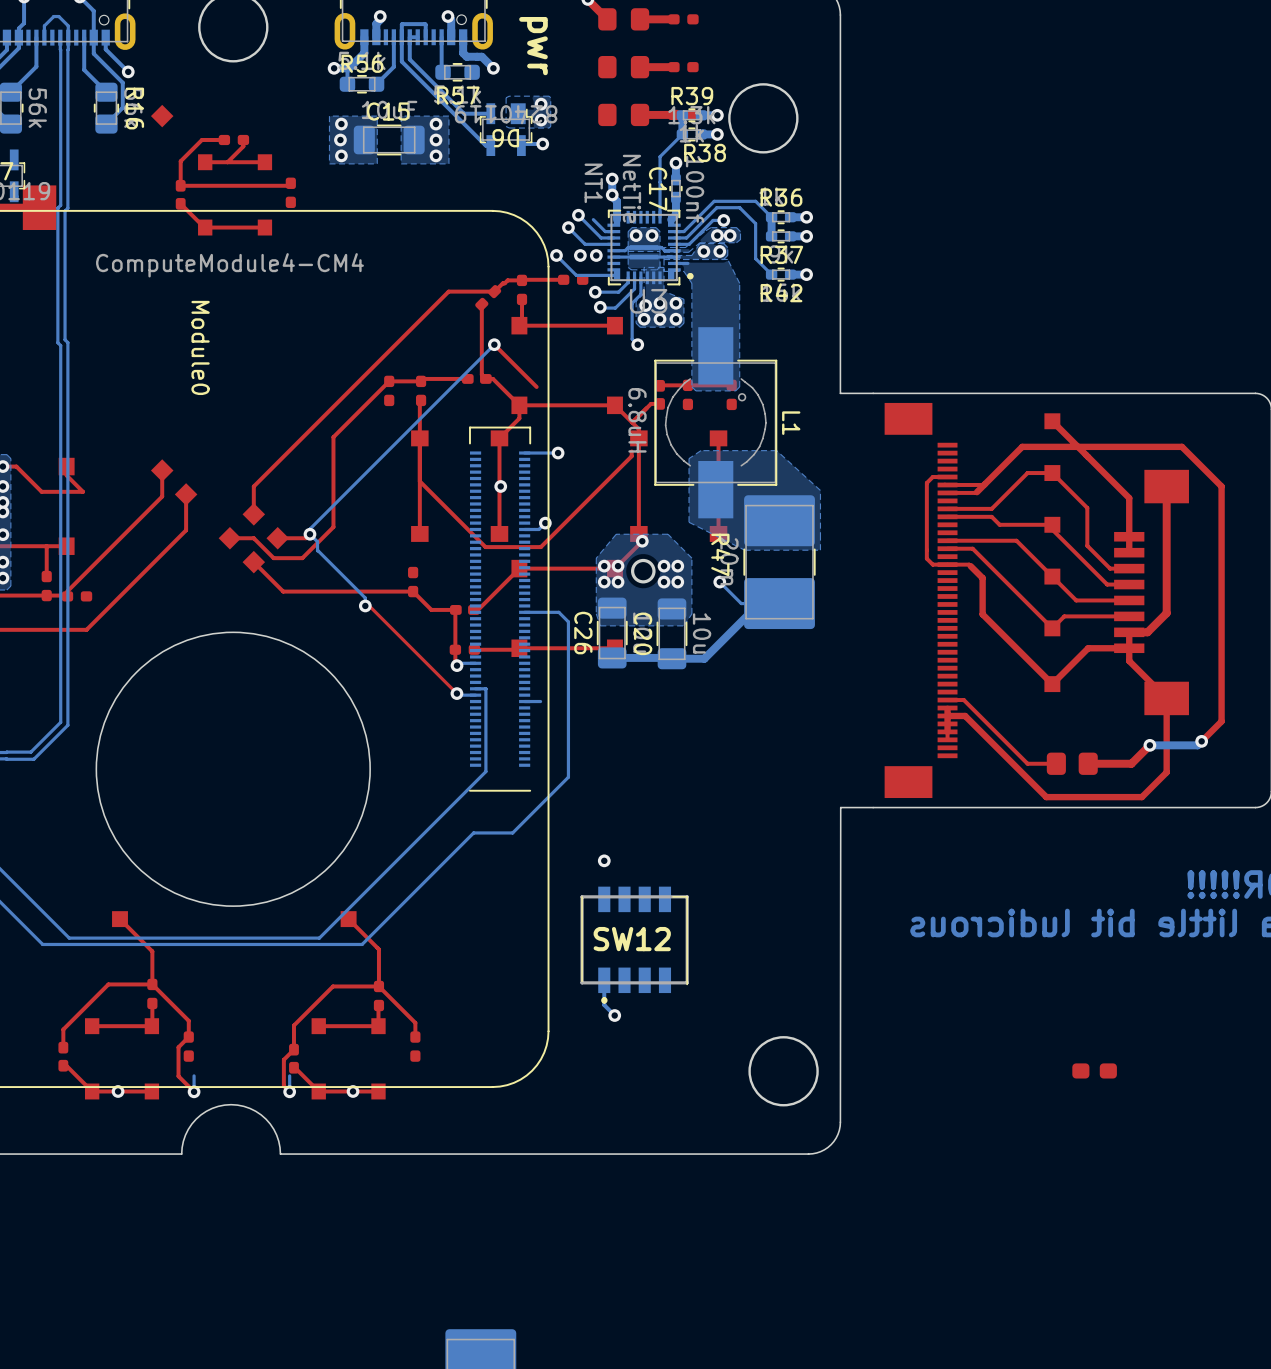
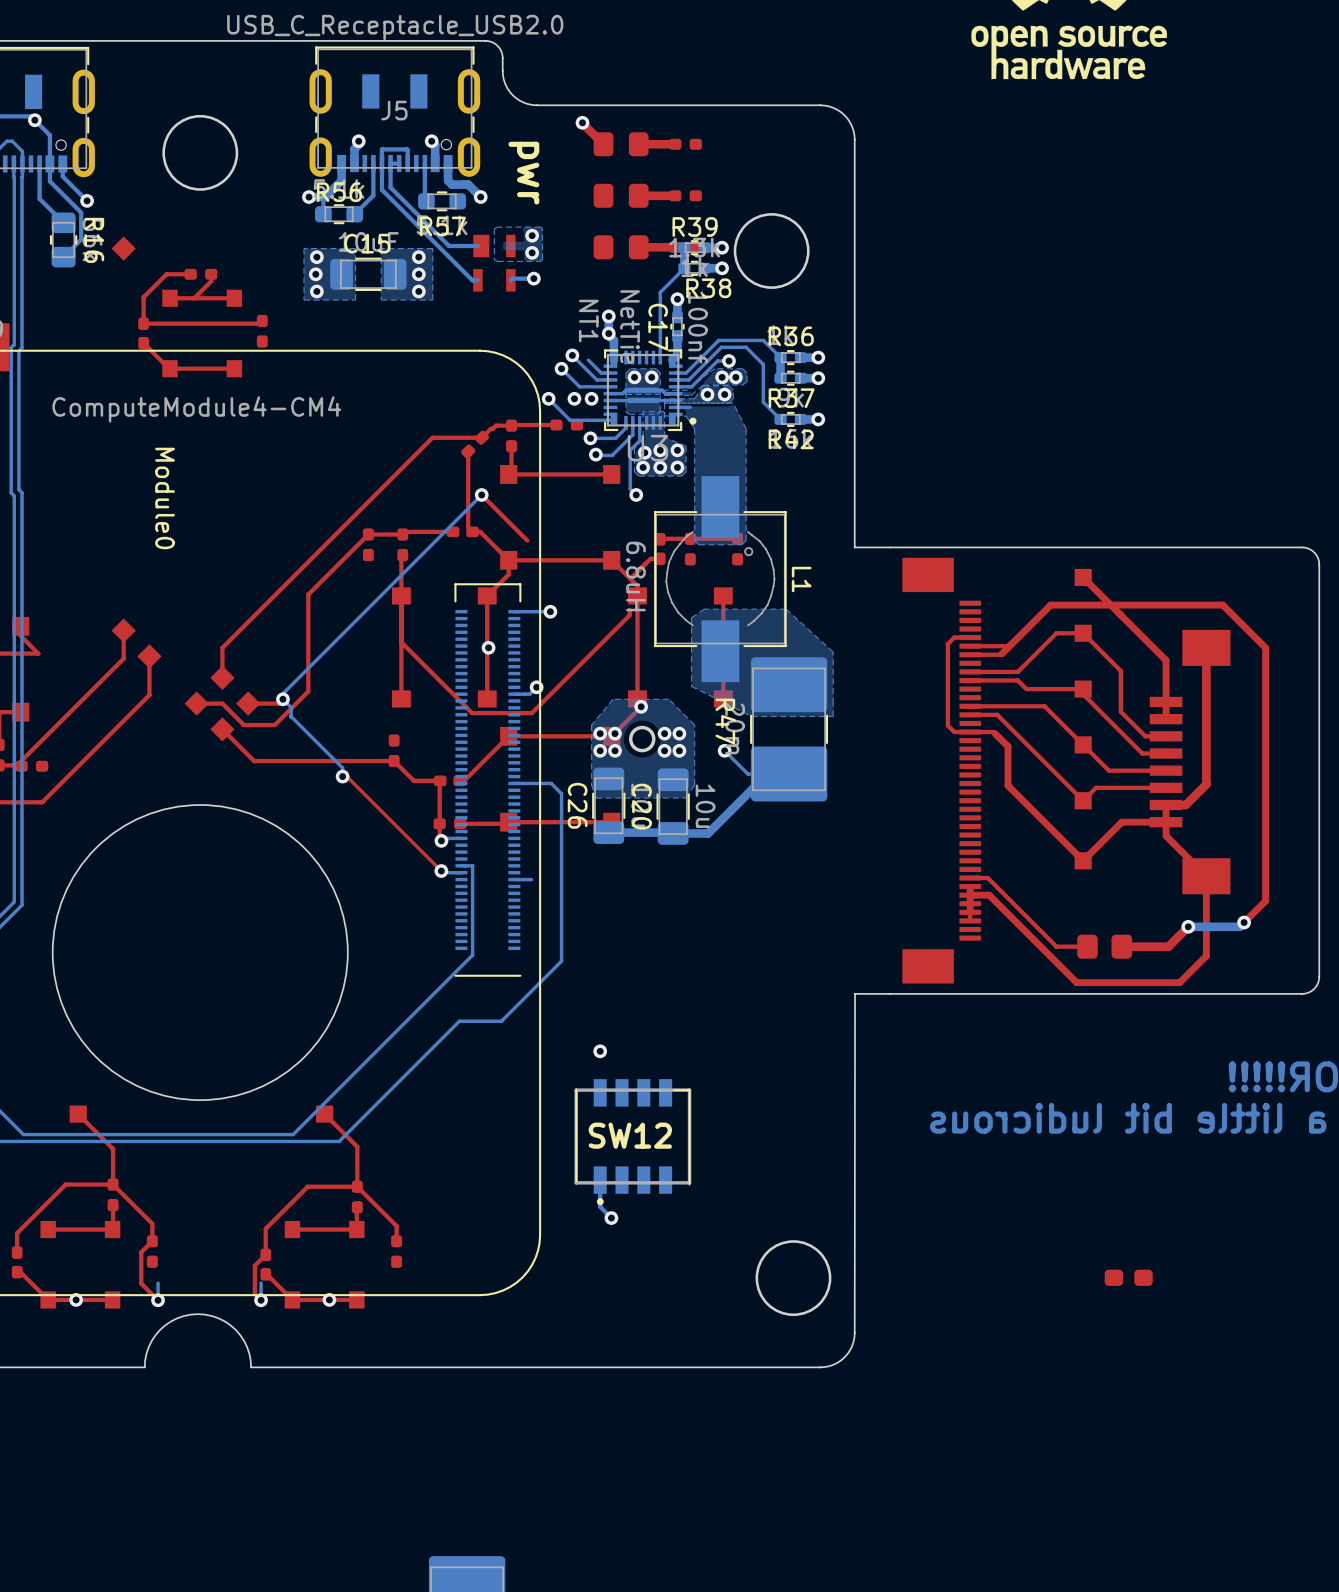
D6 side: bottom (506, 129) -> top (494, 263)

